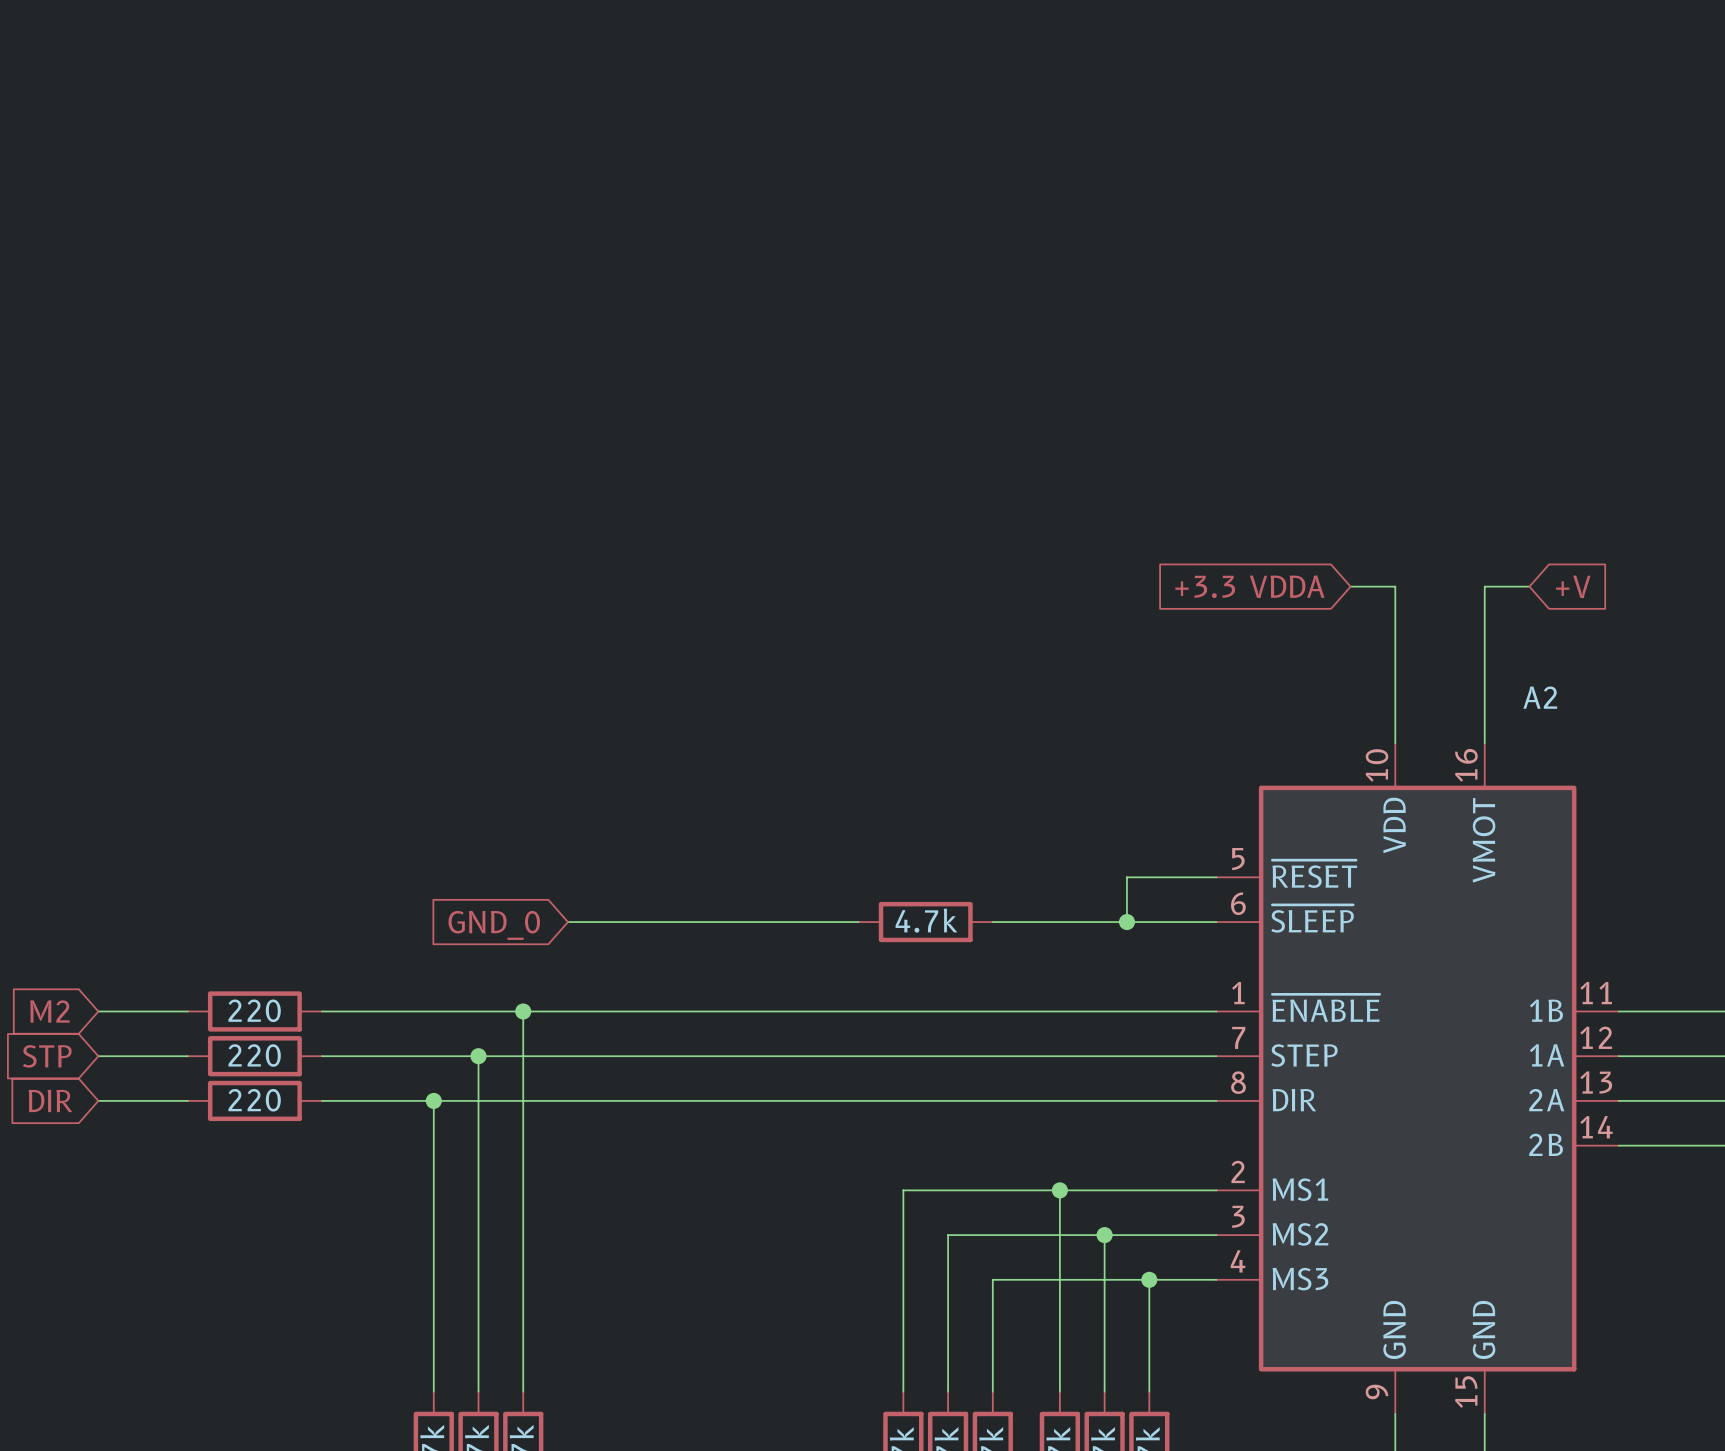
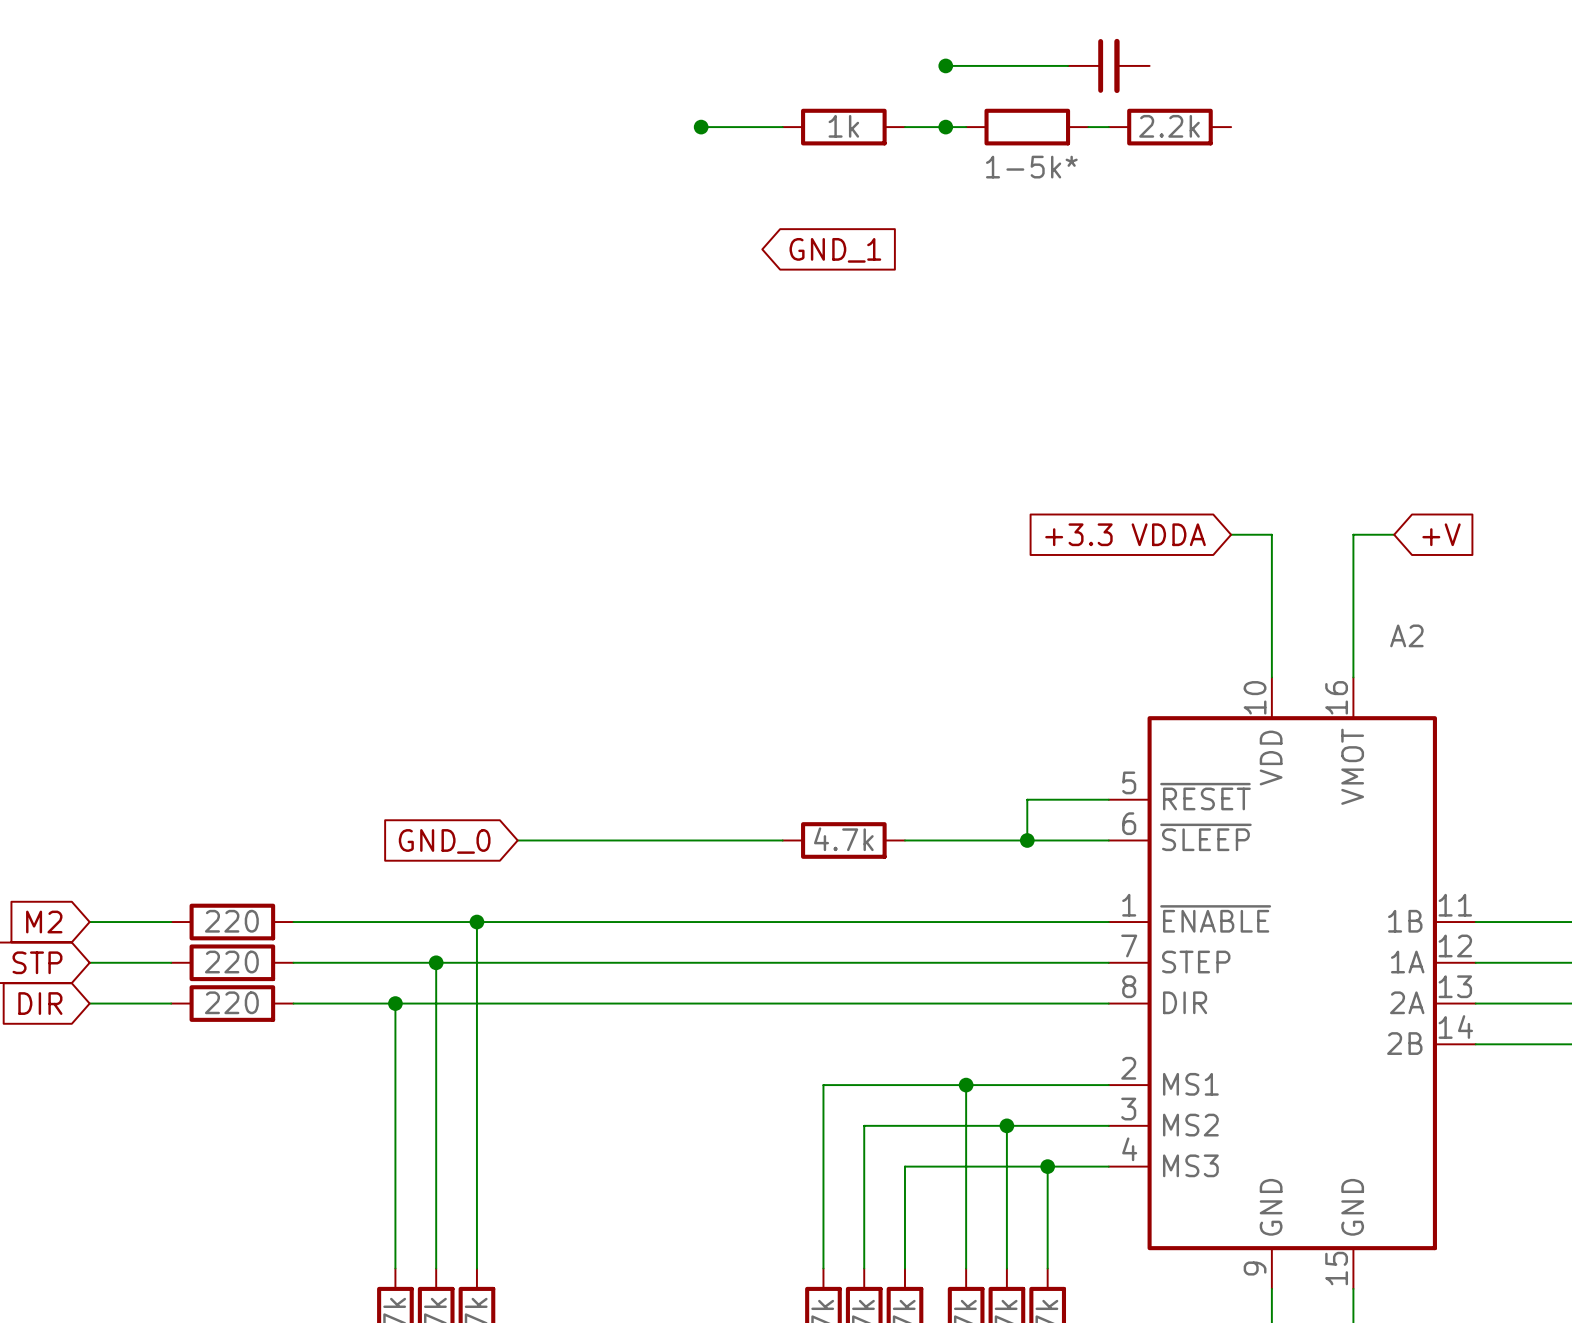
wire: none -> (945, 65) (1068, 65)
junction: none -> (945, 65)
part: none -> (1108, 65)
wire: none -> (701, 127) (782, 127)
junction: none -> (701, 127)
part: none -> 1k (843, 127)
wire: none -> (904, 127) (966, 127)
junction: none -> (945, 127)
part: none -> 1-5k* (1027, 127)
wire: none -> (1088, 127) (1108, 127)
part: none -> 2.2k (1169, 127)
global label: none -> GND_1 (835, 250)

